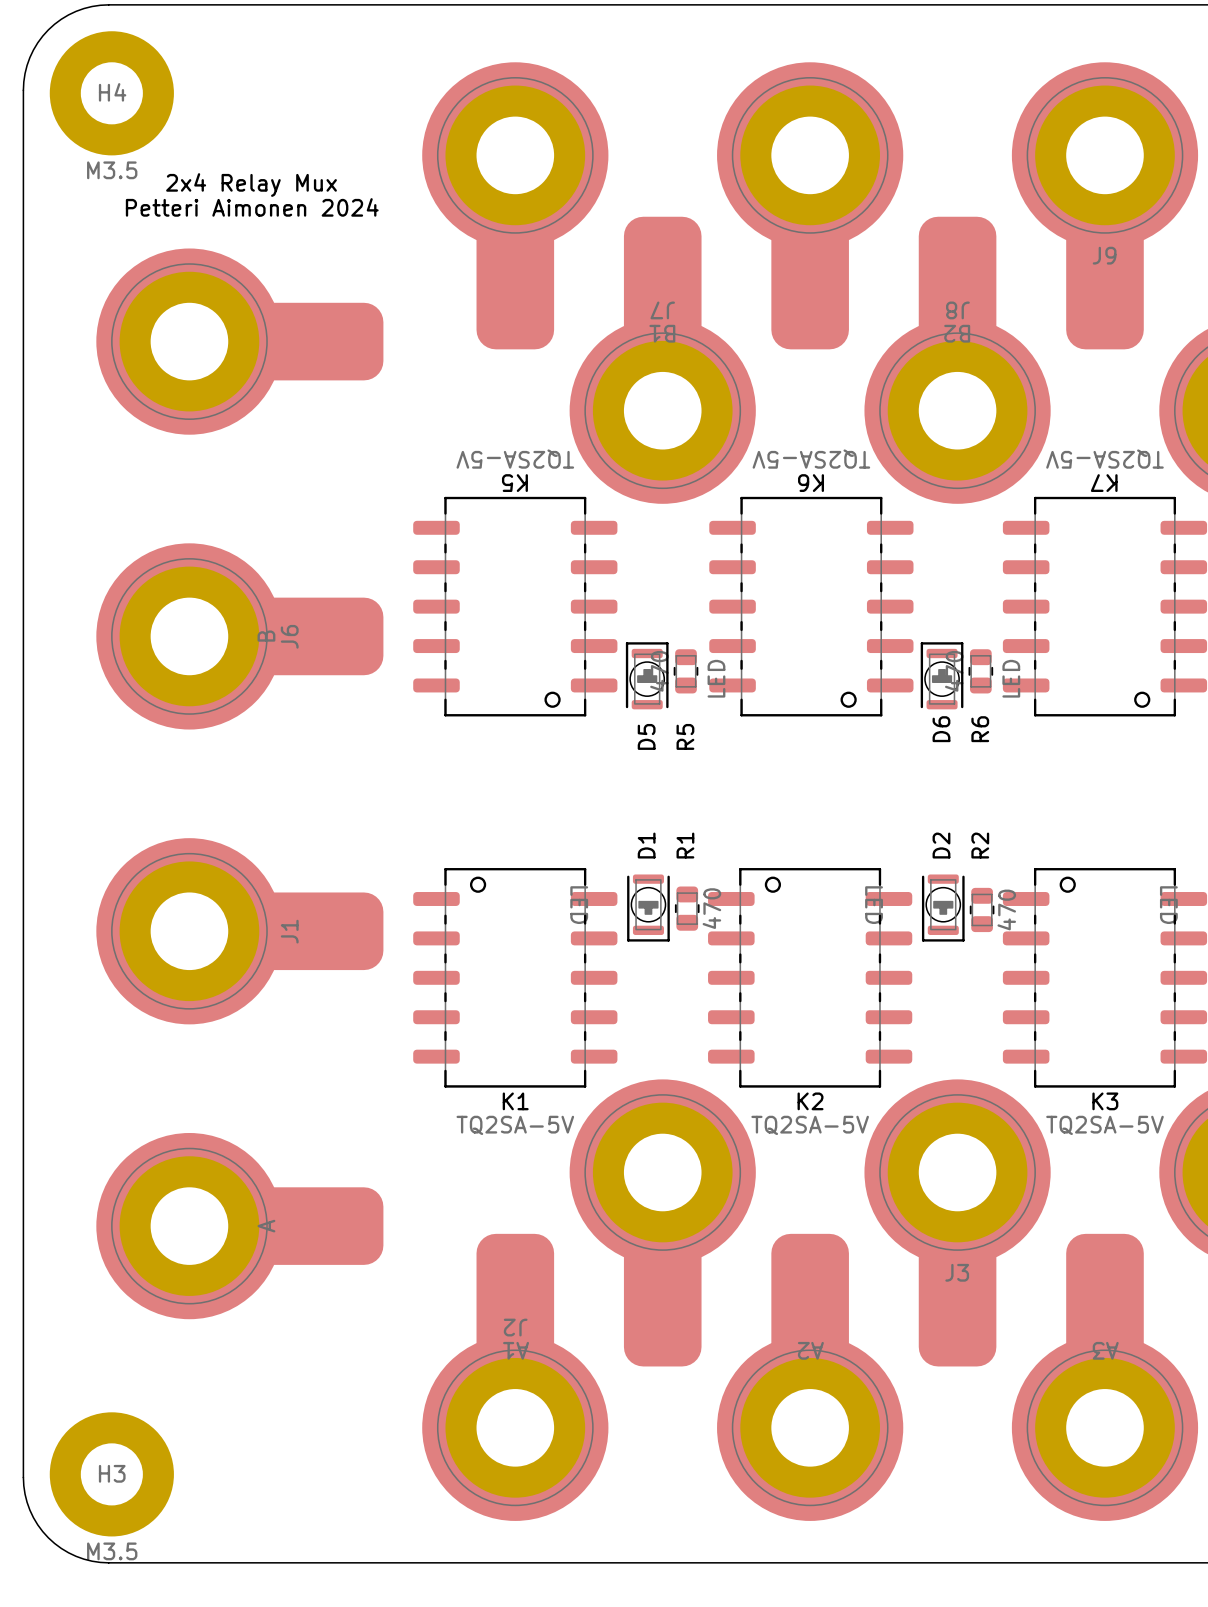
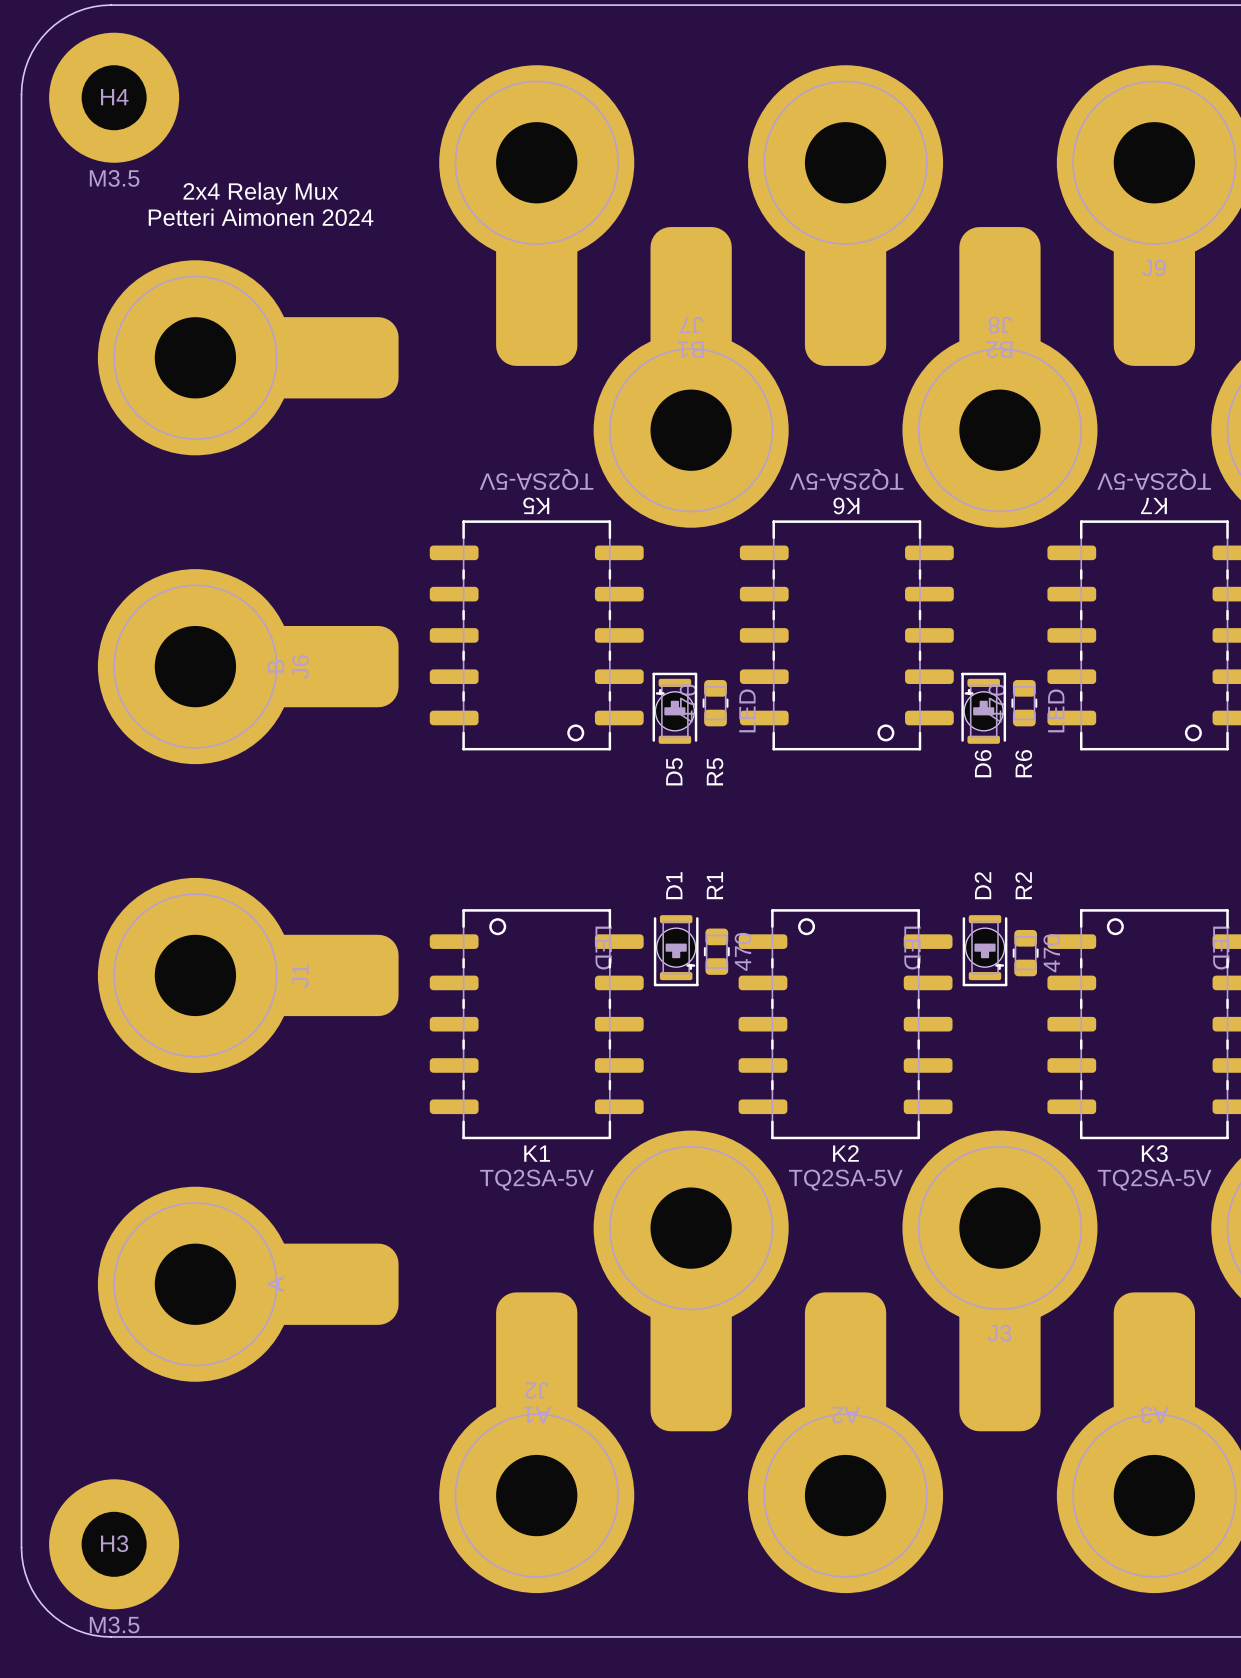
D5 footprint: [625, 642, 669, 710] -> [652, 672, 698, 744]
D6 footprint: [920, 642, 964, 710] -> [961, 672, 1007, 744]
D1 footprint: [627, 874, 670, 942] -> [653, 915, 699, 987]
D2 footprint: [921, 874, 965, 942] -> [962, 915, 1008, 987]

